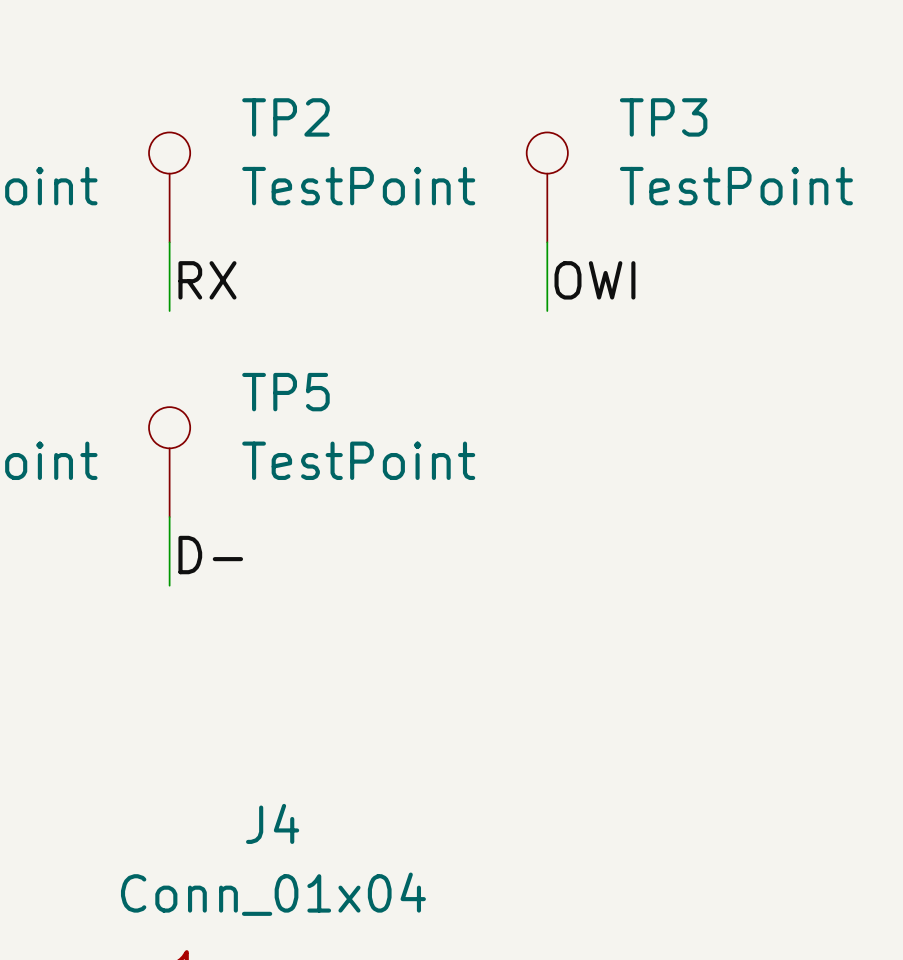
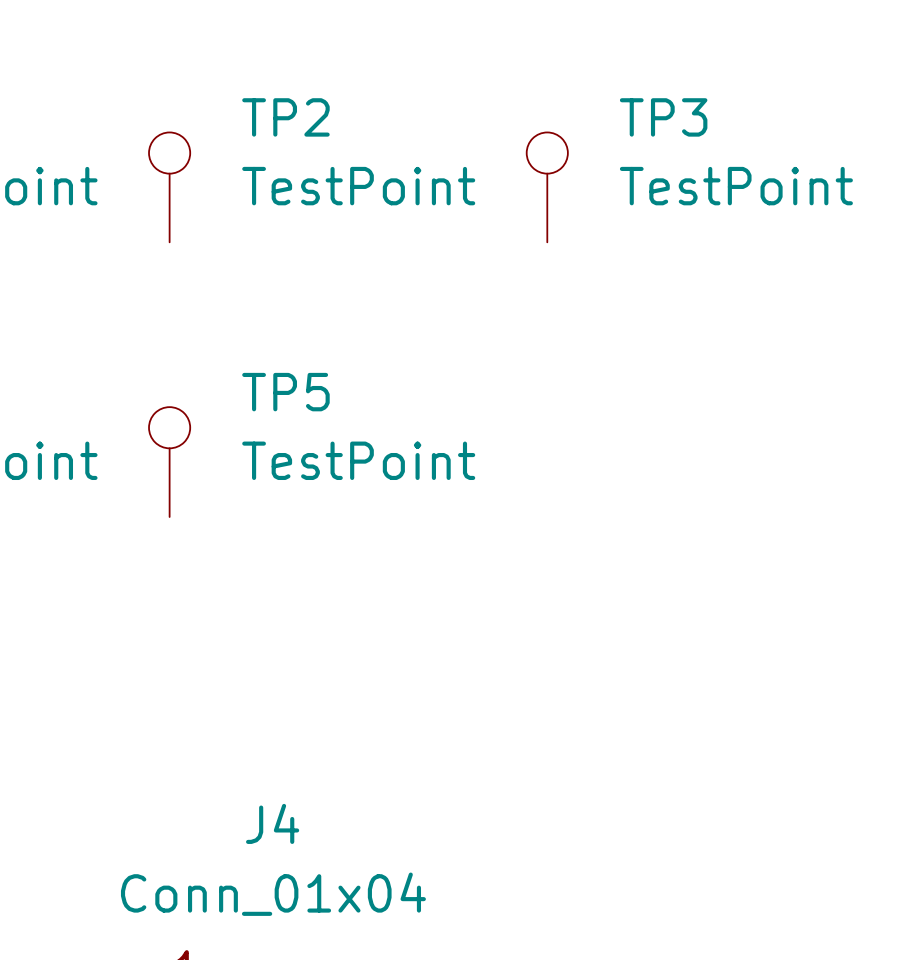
wire: (169, 242) (169, 310) -> none
wire: (547, 242) (547, 310) -> none
label: RX (207, 280) -> none
label: OWI (594, 280) -> none
wire: (169, 517) (169, 585) -> none
label: D- (210, 555) -> none

